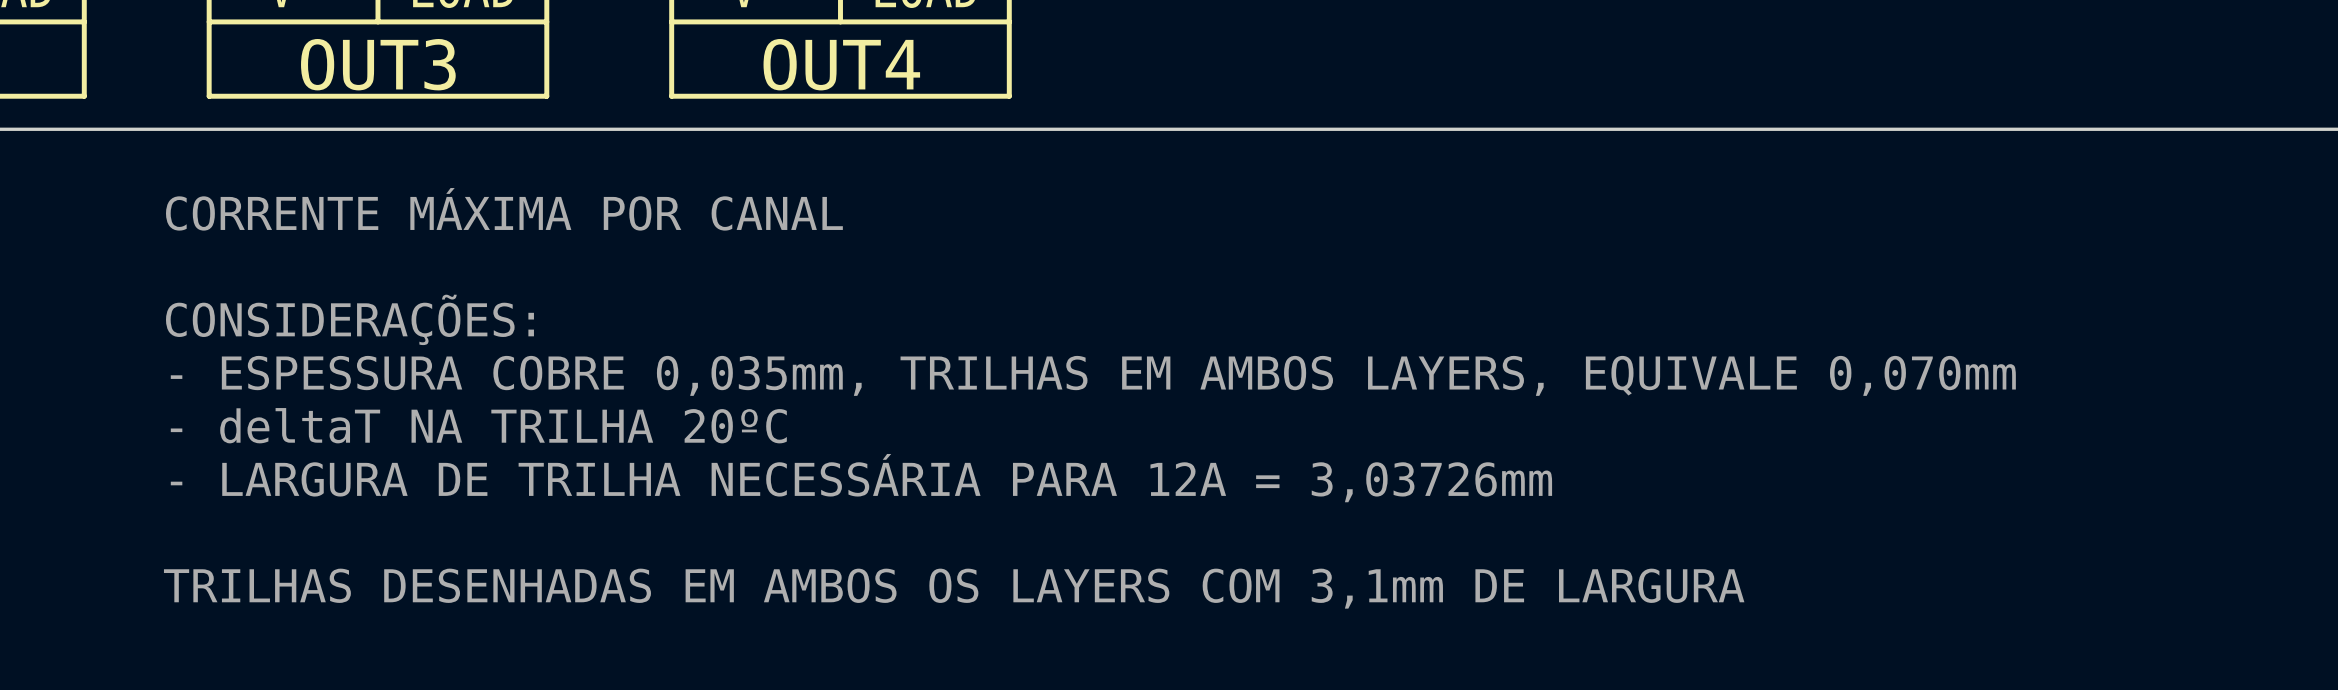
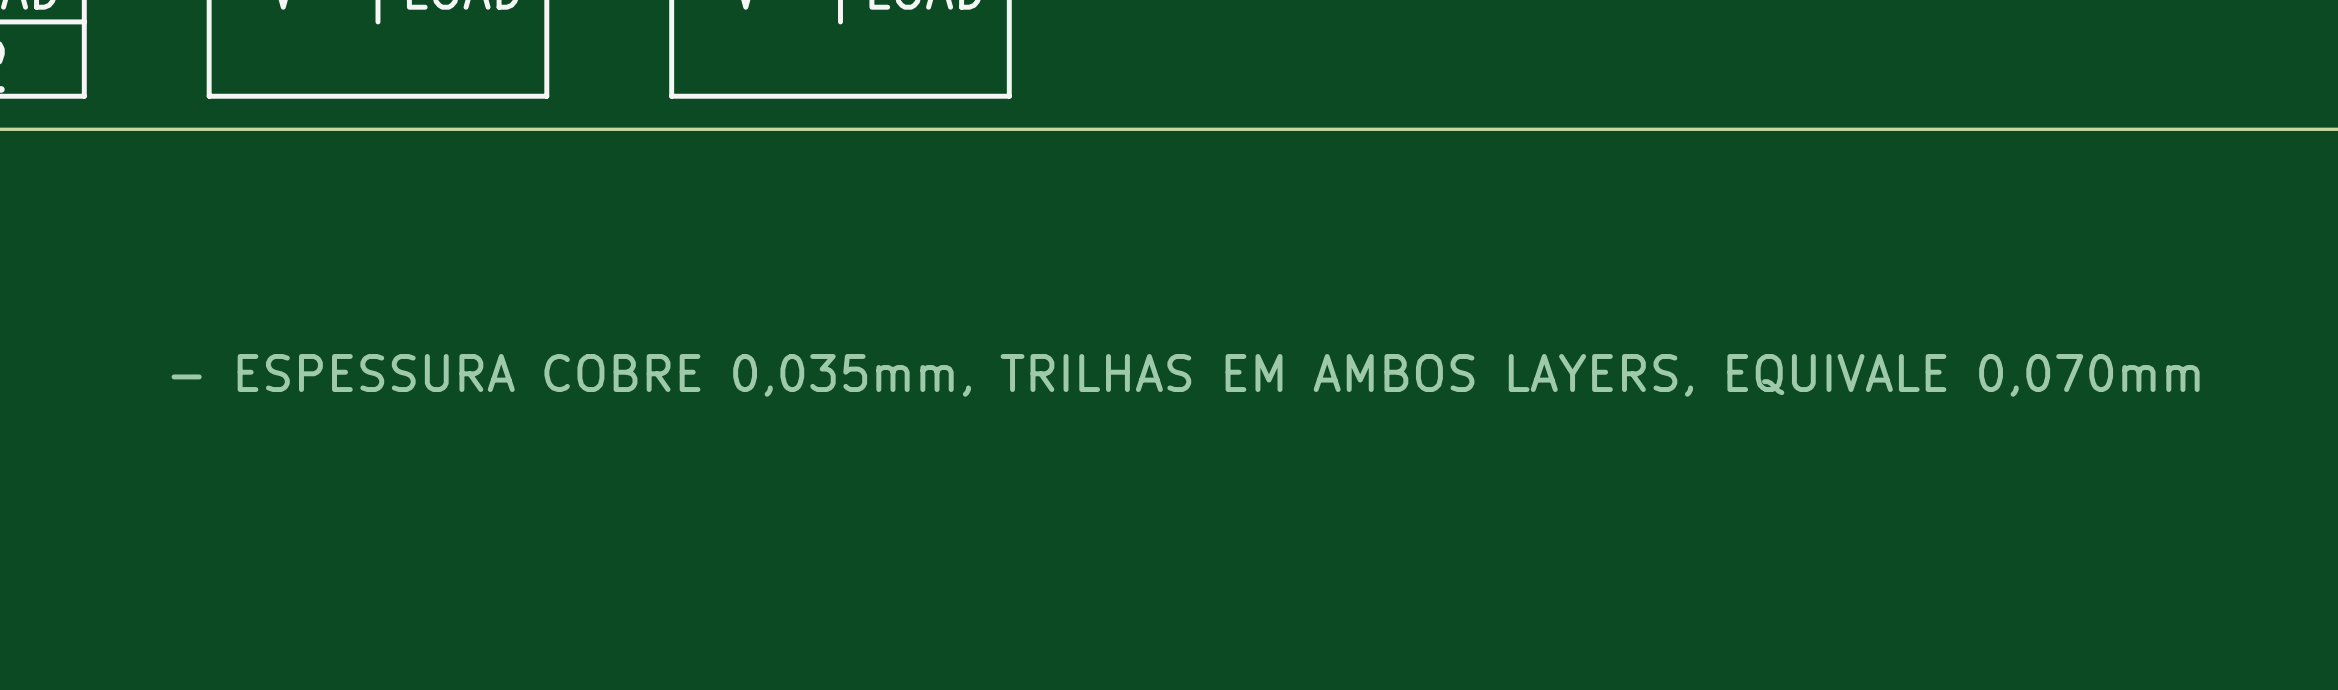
line: (209, 21) (546, 21) -> none
line: (671, 21) (1009, 21) -> none
text: OUT3 (378, 64) -> none
text: OUT4 (841, 64) -> none
text: CORRENTE MÁXIMA POR CANAL (504, 209) -> none
text: CONSIDERAÇÕES: (349, 319) -> none
text: - deltaT NA TRILHA 20ºC (478, 425) -> none
text: - LARGURA DE TRILHA NECESSÁRIA PARA 12A = 3,03726mm (861, 478) -> none
text: TRILHAS DESENHADAS EM AMBOS OS LAYERS COM 3,1mm DE LARGURA (954, 588) -> none

